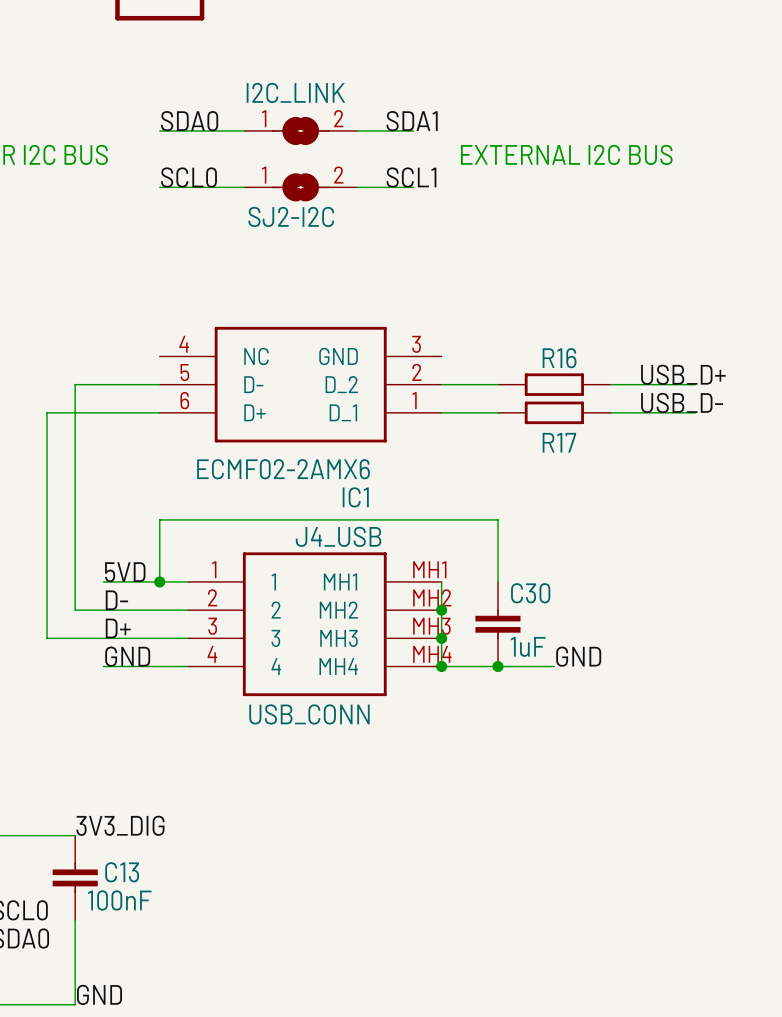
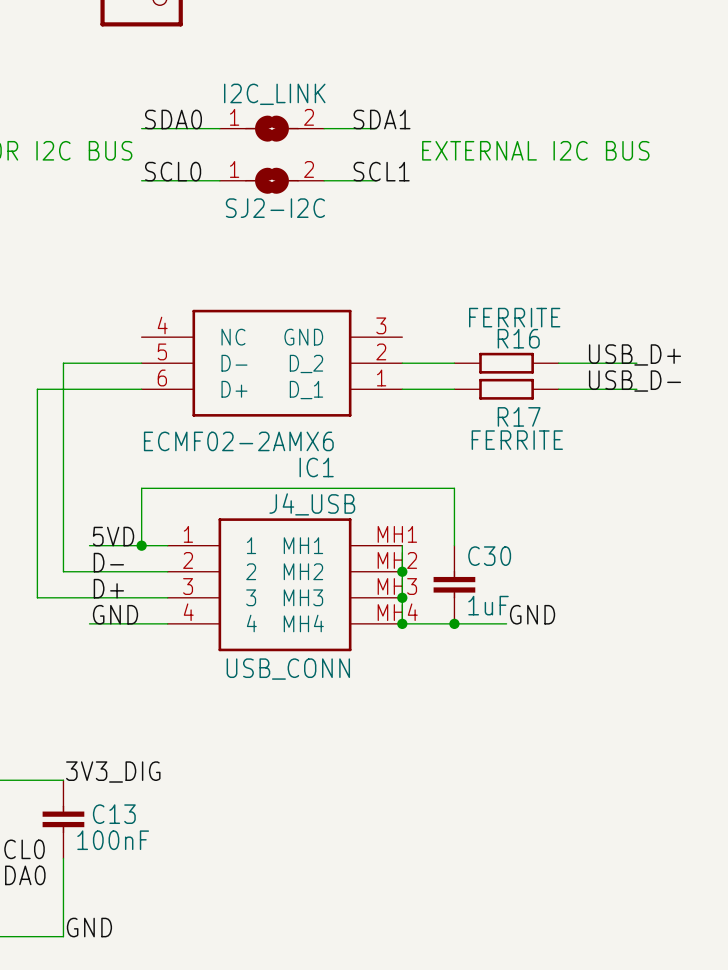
R16 value: none -> FERRITE (514, 317)
R17 value: none -> FERRITE (517, 440)

